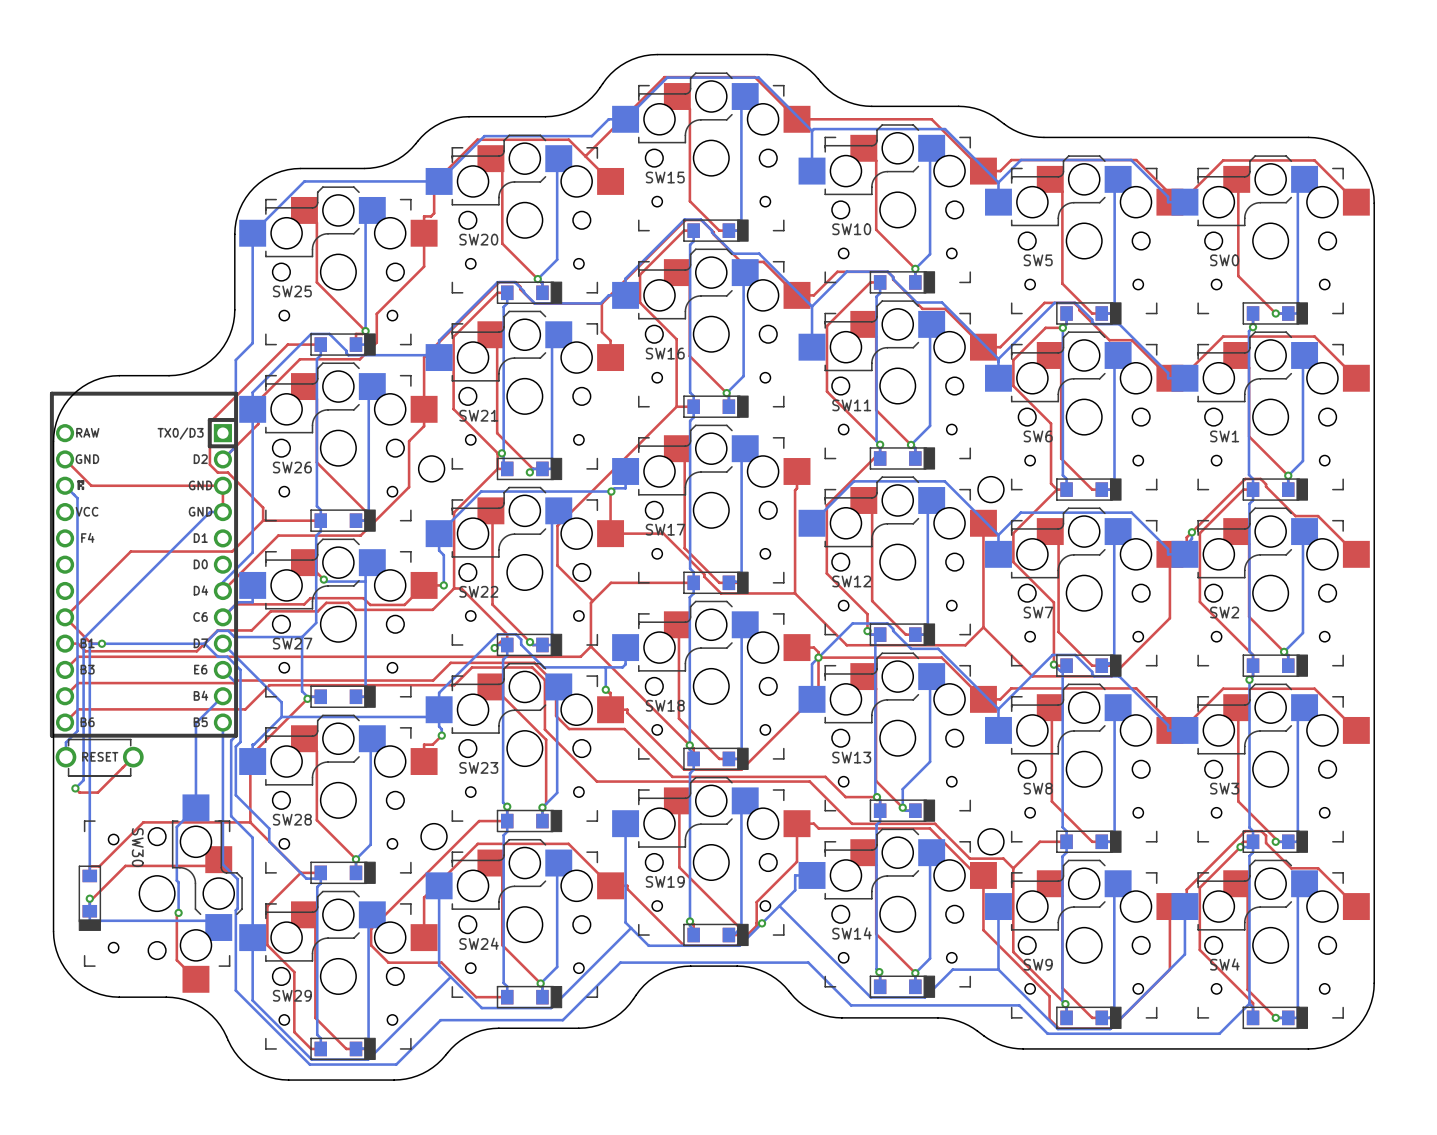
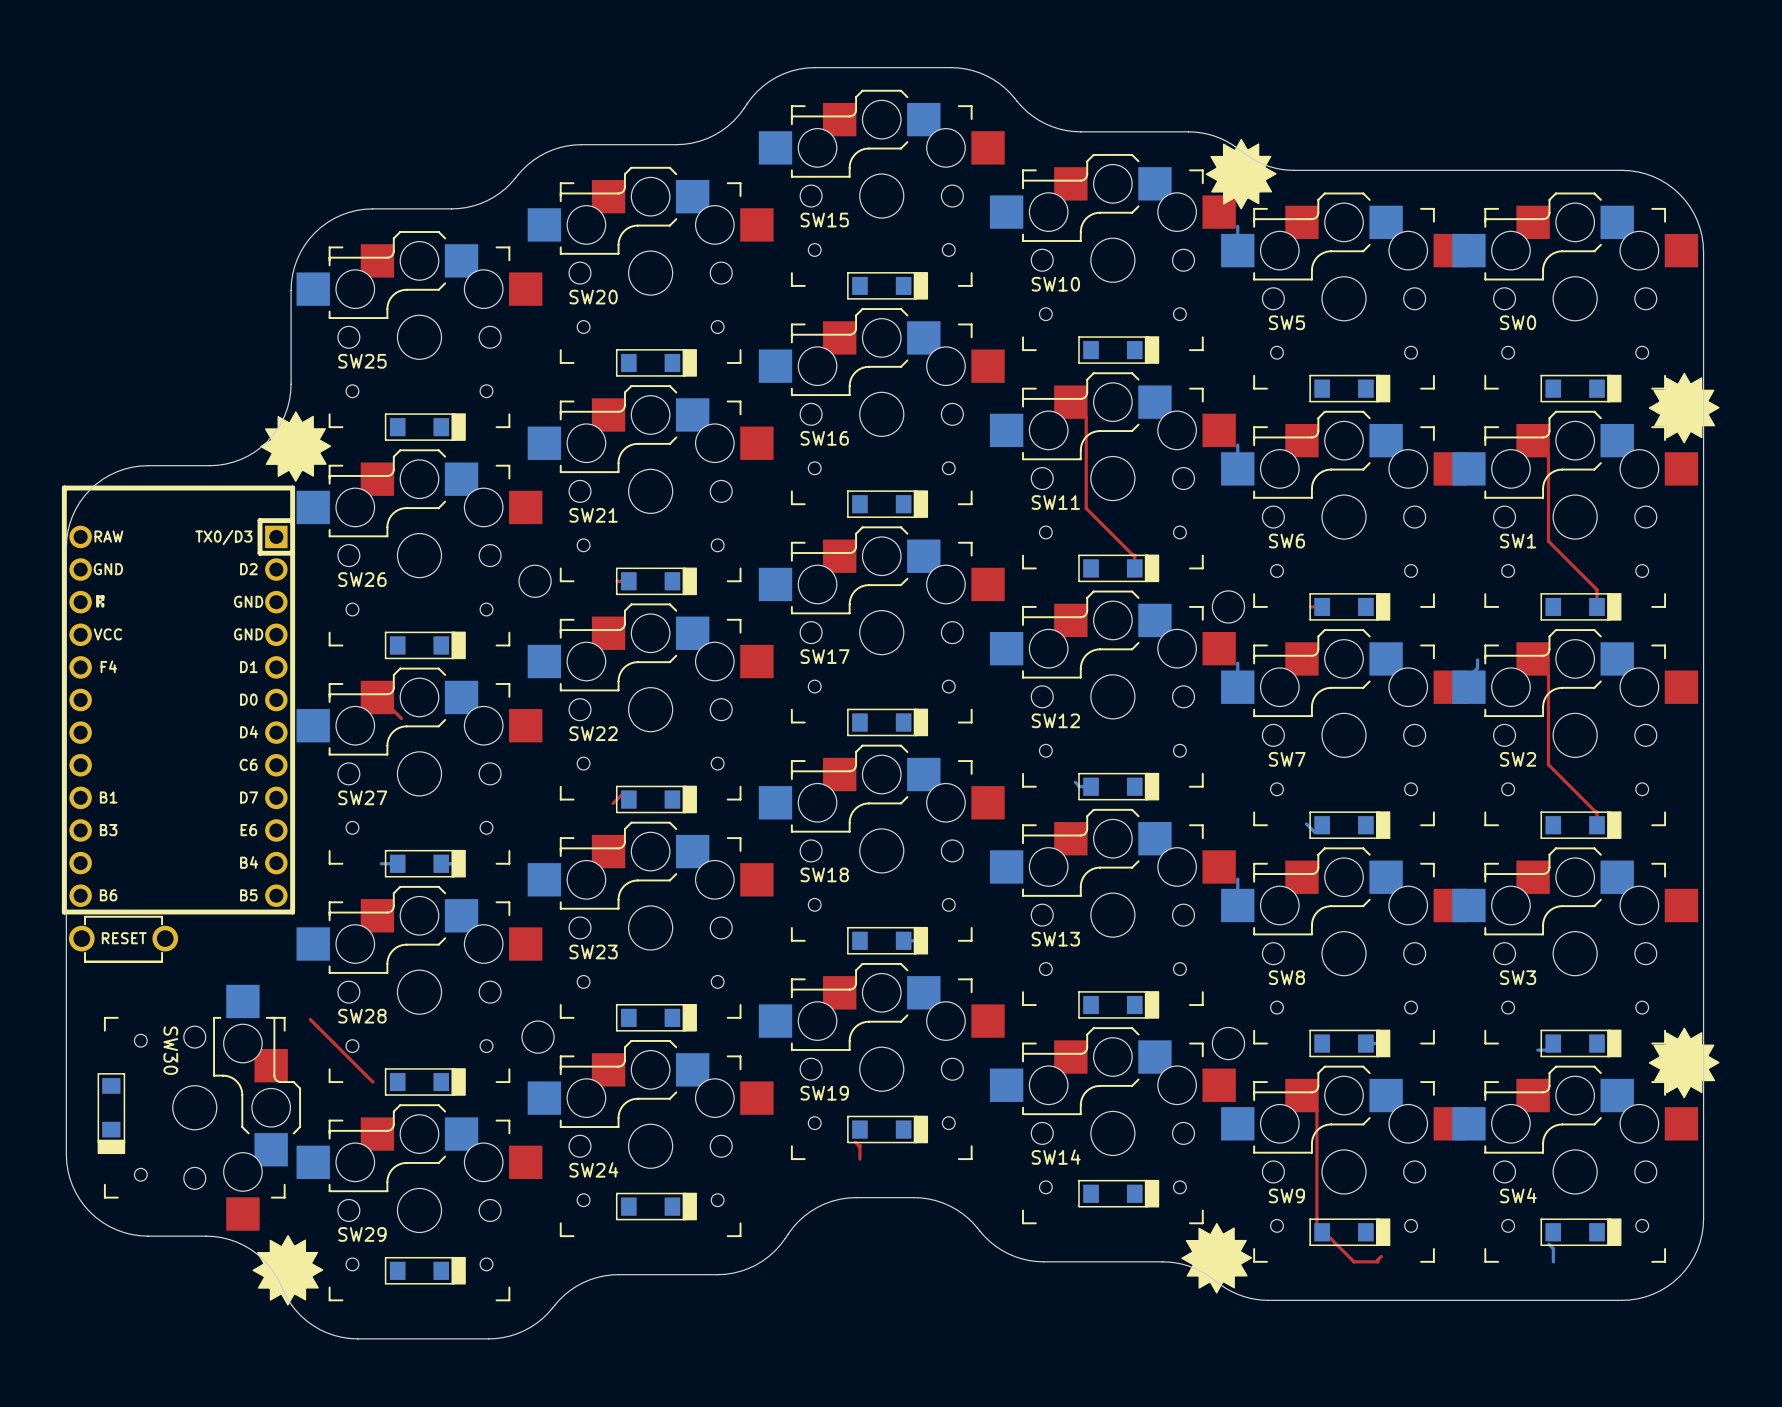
top track: (677, 96) (689, 109) (689, 201) (719, 230) (741, 229) -> none
bottom track: (745, 96) (741, 100) (741, 229) (728, 230) -> none
bottom track: (812, 130) (758, 77) (667, 77) (625, 119) (608, 119) (591, 136) (484, 136) (439, 181) (304, 181) (252, 233) (252, 343) (235, 360) (235, 446) (222, 459) -> none
bottom track: (812, 130) (813, 129) (945, 129) (998, 182) (1021, 159) (1131, 159) (1168, 196) (1168, 202) (1184, 202) -> none
bottom track: (812, 130) (812, 171) -> none
part: none -> (1241, 174)
top track: (863, 148) (876, 160) (876, 229) (915, 268) (915, 282) -> none
bottom track: (931, 148) (930, 149) (930, 254) (915, 268) (915, 282) -> none
top track: (585, 156) (664, 77) (754, 77) (797, 119) (931, 119) (983, 171) (1000, 171) (1011, 160) (1136, 160) (1178, 202) -> none
top track: (490, 158) (502, 170) (502, 243) (542, 282) (542, 292) -> none
bottom track: (558, 158) (557, 160) (557, 259) (537, 279) (542, 282) (542, 292) -> none
top track: (1050, 179) (1062, 191) (1062, 283) (1092, 313) (1111, 313) (1114, 311) -> none
bottom track: (1118, 179) (1114, 182) (1114, 311) (1112, 313) (1101, 313) -> none
top track: (1236, 179) (1238, 180) (1238, 276) (1275, 313) (1288, 313) -> none
bottom track: (1304, 179) (1297, 186) (1297, 313) (1275, 313) -> none
top track: (610, 181) (568, 139) (477, 139) (434, 183) (434, 213) (431, 216) (424, 216) (424, 266) (376, 313) (376, 342) (359, 359) (299, 359) (258, 400) (258, 424) (222, 459) -> none
top track: (1356, 202) (1314, 160) (1223, 160) (1186, 196) (1186, 202) (1169, 202) -> none
top track: (304, 210) (316, 222) (316, 282) (365, 331) (362, 333) (356, 333) (356, 344) -> none
bottom track: (372, 210) (365, 217) (365, 344) (356, 344) -> none
bottom track: (693, 230) (693, 241) (690, 244) (690, 392) (693, 396) (693, 417) (690, 420) (690, 568) (693, 572) (693, 593) (689, 597) (689, 749) (693, 753) (693, 769) (689, 773) (689, 926) (693, 929) (693, 935) -> none
top track: (693, 230) (684, 230) (640, 274) (640, 302) (676, 339) (676, 406) -> none
via: (915, 268) -> none
top track: (677, 272) (689, 285) (689, 356) (728, 395) (728, 406) -> none
bottom track: (745, 272) (743, 274) (743, 376) (726, 393) (728, 395) (728, 406) -> none
via: (537, 279) -> none
bottom track: (880, 282) (880, 293) (876, 296) (876, 441) (880, 444) (880, 458) -> none
top track: (880, 282) (870, 282) (826, 326) (826, 391) (880, 444) (880, 458) -> none
bottom track: (507, 292) (507, 303) (503, 306) (503, 467) (507, 468) -> none
top track: (507, 292) (497, 292) (453, 336) (453, 409) (497, 453) -> none
top track: (601, 303) (685, 220) (701, 220) (741, 261) (763, 261) (797, 295) (813, 295) (837, 271) (887, 271) (922, 308) (945, 308) (983, 347) (1000, 347) (1044, 302) (1074, 302) (1109, 340) (1131, 340) (1169, 378) (1186, 378) (1186, 372) (1223, 336) (1314, 336) (1356, 378) -> none
top track: (601, 303) (601, 332) (610, 340) (610, 357) -> none
top track: (601, 303) (534, 303) (515, 282) (499, 282) (424, 357) (424, 426) (409, 441) (409, 487) (360, 535) (278, 535) (222, 591) -> none
bottom track: (812, 306) (812, 347) -> none
bottom track: (812, 306) (846, 271) (887, 271) (916, 302) (941, 302) (998, 358) (1054, 302) (1075, 302) (1094, 324) (1119, 324) (1168, 372) (1168, 378) (1184, 378) -> none
bottom track: (812, 306) (759, 253) (733, 253) (700, 219) (684, 219) (625, 278) (625, 295) (608, 295) (600, 303) (534, 303) (514, 282) (497, 282) (439, 340) (439, 357) -> none
bottom track: (1066, 313) (1066, 324) (1062, 327) (1062, 475) (1066, 478) (1066, 489) -> none
top track: (1066, 313) (1066, 324) (1062, 327) (1045, 327) (1013, 360) (1013, 386) (1051, 423) (1051, 483) (1057, 489) (1013, 533) (1013, 562) (1053, 602) (1053, 664) (1066, 665) -> none
bottom track: (1253, 313) (1253, 327) (1248, 331) (1248, 474) (1253, 478) (1253, 500) (1249, 503) (1249, 651) (1253, 655) (1253, 676) (1249, 679) (1249, 827) (1253, 831) (1253, 852) (1249, 855) (1249, 1003) (1219, 1033) (1047, 1033) (1019, 1005) (851, 1005) (808, 962) (620, 962) (562, 1020) (440, 1020) (396, 1064) (309, 1064) (235, 990) (237, 879) (222, 864) (222, 722) -> none
via: (1275, 313) -> none
bottom track: (931, 324) (930, 325) (930, 425) (911, 444) (915, 447) (915, 458) -> none
via: (1062, 327) -> none
via: (1253, 327) -> none
part: none -> (1684, 408)
via: (365, 331) -> none
top track: (490, 334) (497, 341) (497, 433) (532, 468) -> none
bottom track: (558, 334) (552, 341) (552, 468) (532, 468) (529, 472) -> none
bottom track: (320, 344) (320, 355) (316, 359) (316, 506) (320, 510) (320, 531) (316, 535) (316, 622) (302, 637) -> none
top track: (320, 344) (287, 344) (209, 422) (209, 464) (217, 472) (227, 472) (263, 507) (263, 520) -> none
bottom track: (439, 355) (348, 355) (329, 333) (311, 333) (252, 392) (252, 552) (222, 582) (222, 591) -> none
top track: (1050, 355) (1061, 366) (1061, 458) (1092, 489) (1114, 489) -> none
bottom track: (1118, 355) (1114, 359) (1114, 489) (1101, 489) -> none
bottom track: (1304, 355) (1302, 357) (1302, 460) (1288, 475) (1288, 489) -> none
part: none -> (295, 446)
top track: (304, 386) (316, 398) (316, 462) (368, 514) (365, 520) (356, 520) -> none
bottom track: (372, 386) (368, 390) (368, 515) (365, 520) (356, 520) -> none
via: (726, 393) -> none
top track: (676, 406) (557, 525) (557, 565) (592, 601) -> none
top track: (693, 406) (676, 406) -> none
via: (880, 444) -> none
via: (911, 444) -> none
top track: (677, 448) (684, 456) (684, 548) (719, 582) (741, 581) -> none
bottom track: (745, 448) (741, 452) (741, 581) (728, 582) -> none
top track: (497, 453) (497, 468) (454, 512) (454, 588) -> none
via: (501, 453) -> none
top track: (880, 453) (826, 505) (826, 573) (867, 614) (867, 631) (870, 634) (880, 634) -> none
top track: (65, 459) (91, 485) (222, 485) (222, 512) -> none
bottom track: (625, 471) (625, 488) (614, 488) (611, 491) (481, 491) (439, 533) (439, 550) (443, 555) (443, 585) -> none
top track: (797, 471) (797, 488) (795, 490) (795, 593) -> none
via: (529, 472) -> none
via: (1288, 475) -> none
bottom track: (65, 485) (77, 498) (77, 730) (65, 742) (65, 757) -> none
top track: (1253, 489) (1243, 489) (1199, 533) (1199, 601) (1253, 655) (1253, 676) -> none
top track: (611, 491) (610, 533) (663, 533) (721, 593) (795, 593) -> none
via: (611, 491) -> none
top track: (863, 500) (872, 508) (872, 601) (905, 634) (927, 634) -> none
bottom track: (931, 500) (927, 504) (927, 634) (915, 634) -> none
top track: (490, 510) (492, 512) (492, 604) (532, 644) (542, 644) -> none
bottom track: (558, 510) (552, 517) (552, 644) (532, 644) (530, 642) -> none
bottom track: (222, 512) (210, 512) (83, 638) (83, 780) (75, 788) -> none
top track: (263, 520) (232, 551) (130, 551) (65, 617) (91, 643) (101, 643) -> none
top track: (320, 520) (263, 520) -> none
bottom track: (812, 523) (853, 481) (944, 481) (998, 535) (1020, 512) (1131, 512) (1168, 549) (1168, 554) (1184, 554) -> none
top track: (983, 523) (983, 627) -> none
top track: (1050, 531) (1058, 539) (1058, 632) (1092, 665) (1111, 665) (1114, 663) -> none
bottom track: (1118, 531) (1114, 535) (1114, 663) (1101, 665) -> none
bottom track: (1304, 531) (1302, 533) (1302, 633) (1284, 651) (1288, 655) (1288, 665) -> none
via: (1191, 532) -> none
top track: (1356, 554) (1318, 516) (1295, 516) (1260, 478) (1245, 478) (1186, 537) (1186, 554) (1169, 554) (1169, 618) (1111, 676) (1032, 676) (983, 627) -> none
bottom track: (372, 562) (365, 569) (365, 696) -> none
bottom track: (323, 579) (325, 581) (365, 581) -> none
via: (323, 579) -> none
top track: (693, 582) (610, 582) (590, 602) (590, 646) -> none
bottom track: (252, 585) (252, 602) (237, 602) (222, 617) -> none
top track: (443, 585) (424, 585) (404, 604) (370, 604) (363, 598) (310, 598) (304, 604) (235, 604) (222, 617) -> none
via: (443, 585) -> none
top track: (454, 588) (461, 588) (507, 634) (507, 644) -> none
top track: (454, 588) (432, 609) (355, 609) (348, 602) (326, 602) (317, 611) (270, 611) (251, 630) (217, 630) (196, 651) (85, 651) (77, 643) (65, 643) -> none
top track: (795, 593) (846, 645) (965, 645) (983, 627) -> none
top track: (677, 624) (678, 626) (678, 718) (719, 758) (738, 758) -> none
bottom track: (745, 624) (741, 628) (741, 758) -> none
via: (867, 631) -> none
bottom track: (875, 634) (875, 795) (879, 800) -> none
bottom track: (302, 637) (302, 691) (307, 698) -> none
bottom track: (302, 637) (234, 637) (228, 630) (217, 630) (204, 643) -> none
via: (530, 642) -> none
via: (101, 643) -> none
bottom track: (204, 643) (89, 643) (89, 875) -> none
bottom track: (204, 643) (217, 656) (227, 656) (240, 669) (240, 741) (235, 746) (235, 795) (269, 828) (269, 841) (306, 878) (320, 878) -> none
bottom track: (222, 643) (281, 702) (281, 716) -> none
bottom track: (497, 644) (507, 644) (507, 655) (503, 659) (503, 802) (507, 806) (507, 831) (503, 835) (503, 982) (507, 986) (507, 997) -> none
top track: (590, 646) (693, 748) (693, 758) -> none
top track: (590, 646) (580, 656) (78, 656) (65, 669) -> none
bottom track: (625, 647) (625, 664) (622, 667) (543, 667) (521, 644) (521, 639) (516, 634) (497, 634) (439, 692) (439, 726) (441, 729) (441, 735) -> none
top track: (797, 647) (813, 647) (818, 652) (818, 692) (741, 769) (684, 769) (627, 712) (627, 709) (610, 709) (610, 692) (605, 689) -> none
via: (494, 648) -> none
via: (1284, 651) -> none
top track: (818, 657) (941, 657) (983, 699) (1000, 699) (1011, 688) (1136, 688) (1178, 730) -> none
via: (818, 657) -> none
via: (1053, 664) -> none
bottom track: (605, 667) (605, 689) -> none
bottom track: (222, 669) (235, 682) (235, 735) (231, 740) (231, 816) (252, 837) (252, 1000) (311, 1059) (368, 1059) (450, 976) -> none
bottom track: (1062, 671) (1062, 827) (1066, 831) (1066, 852) (1062, 856) (1062, 1001) (1066, 1007) (1066, 1017) -> none
top track: (863, 676) (876, 688) (876, 780) (905, 810) (915, 810) -> none
bottom track: (931, 676) (930, 678) (930, 761) (902, 789) (902, 807) (905, 810) (915, 810) -> none
via: (1249, 679) -> none
top track: (490, 686) (493, 686) (546, 739) (546, 803) (542, 807) (542, 821) -> none
bottom track: (558, 686) (557, 688) (557, 792) (542, 807) (542, 821) -> none
via: (605, 689) -> none
top track: (65, 696) (78, 683) (433, 680) (450, 662) (534, 662) (556, 684) (556, 716) (569, 729) (624, 729) (672, 776) (825, 776) (845, 797) (877, 797) (880, 800) (880, 810) -> none
bottom track: (222, 696) (195, 723) (195, 807) (176, 826) (178, 912) -> none
top track: (320, 696) (307, 698) (250, 756) (250, 822) (143, 822) (99, 866) (89, 866) (89, 875) -> none
via: (307, 698) -> none
bottom track: (812, 699) (812, 664) (852, 623) (887, 623) (911, 648) (938, 648) (998, 709) (1052, 654) (1075, 654) (1094, 676) (1119, 676) (1168, 725) (1168, 730) (1184, 730) -> none
top track: (1050, 707) (1051, 709) (1051, 801) (1092, 841) (1114, 841) -> none
bottom track: (1118, 707) (1114, 711) (1114, 841) -> none
top track: (1236, 707) (1238, 709) (1238, 801) (1275, 838) (1275, 841) (1288, 841) -> none
bottom track: (1304, 707) (1297, 714) (1297, 841) (1275, 841) -> none
bottom track: (281, 716) (252, 744) (252, 761) -> none
bottom track: (439, 716) (281, 716) -> none
top track: (65, 722) (78, 709) (245, 709) (269, 685) (454, 685) (472, 667) (532, 667) (544, 679) (544, 729) (596, 781) (809, 781) (852, 823) (935, 823) (969, 858) (1003, 858) (1013, 868) -> none
top track: (1356, 730) (1314, 688) (1223, 688) (1186, 725) (1186, 730) (1169, 730) -> none
top track: (441, 735) (432, 744) (424, 744) (424, 761) -> none
via: (441, 735) -> none
top track: (304, 738) (316, 751) (316, 820) (356, 859) (356, 872) -> none
bottom track: (372, 738) (370, 740) (370, 844) (356, 859) (356, 872) -> none
via: (689, 745) -> none
top track: (133, 757) (97, 792) (79, 792) (75, 788) -> none
via: (75, 788) -> none
via: (876, 797) -> none
top track: (677, 800) (679, 802) (679, 867) (741, 929) (738, 935) (728, 935) -> none
bottom track: (745, 800) (741, 804) (741, 929) (733, 935) (728, 935) -> none
bottom track: (880, 800) (880, 821) (876, 824) (876, 969) (879, 972) (880, 986) -> none
top track: (507, 806) (507, 821) (479, 821) (371, 929) (371, 945) (388, 962) (441, 962) (476, 997) (507, 997) -> none
via: (507, 806) -> none
via: (542, 807) -> none
via: (902, 807) -> none
bottom track: (625, 823) (625, 922) (648, 945) (739, 945) (795, 890) (795, 875) (812, 875) -> none
top track: (1066, 841) (1039, 841) (1013, 868) -> none
top track: (1253, 841) (1243, 841) (1240, 847) (1199, 887) (1199, 949) (1253, 1003) (1253, 1017) -> none
via: (1275, 841) -> none
via: (1240, 847) -> none
top track: (863, 852) (876, 865) (876, 934) (915, 973) (915, 986) -> none
bottom track: (931, 852) (930, 854) (930, 958) (915, 973) (915, 986) -> none
part: none -> (1684, 1062)
top track: (218, 859) (212, 865) (125, 865) (89, 901) (89, 911) -> none
via: (356, 859) -> none
top track: (490, 863) (502, 874) (502, 945) (542, 985) (542, 997) -> none
bottom track: (558, 863) (557, 864) (557, 967) (540, 983) (542, 985) (542, 997) -> none
top track: (1013, 868) (1013, 951) (1065, 1004) (1066, 1017) -> none
bottom track: (320, 872) (320, 883) (317, 887) (317, 1034) (320, 1038) (320, 1048) -> none
top track: (320, 872) (300, 872) (267, 906) (267, 945) (294, 972) (294, 1032) (311, 1048) (320, 1048) -> none
bottom track: (1118, 883) (1114, 887) (1114, 1013) (1109, 1017) (1101, 1017) -> none
top track: (1236, 883) (1247, 894) (1247, 989) (1275, 1017) (1288, 1017) -> none
bottom track: (1304, 883) (1297, 890) (1297, 1017) (1275, 1017) -> none
bottom track: (439, 885) (439, 965) (481, 1008) (551, 1008) (631, 928) -> none
bottom track: (89, 898) (89, 920) (212, 920) (218, 927) -> none
via: (89, 898) -> none
bottom track: (779, 905) (870, 997) (924, 997) (952, 969) (998, 969) -> none
bottom track: (998, 906) (998, 969) -> none
bottom track: (1184, 906) (1184, 954) (1110, 1029) (1057, 1029) (998, 969) -> none
top track: (1356, 906) (1318, 868) (1291, 868) (1266, 843) (1266, 835) (1261, 831) (1245, 831) (1186, 889) (1186, 906) (1169, 906) (1169, 969) (1110, 1028) (1058, 1028) (1049, 1019) (1049, 996) (983, 930) (983, 875) (976, 875) (929, 828) (818, 828) (813, 823) (797, 823) (797, 861) (756, 902) (756, 925) (736, 945) (684, 945) (627, 888) (627, 885) (610, 885) (568, 843) (477, 843) (424, 897) (424, 937) -> none
top track: (178, 912) (176, 914) (176, 960) (195, 979) -> none
via: (178, 912) -> none
top track: (304, 914) (315, 925) (315, 1017) (346, 1048) (368, 1048) -> none
bottom track: (372, 914) (368, 918) (368, 1048) (356, 1048) -> none
via: (689, 921) -> none
via: (762, 923) -> none
part position: (715, 934) -> (887, 1129)
via: (879, 972) -> none
via: (915, 973) -> none
via: (540, 983) -> none
part position: (902, 986) -> (1118, 1193)
part position: (529, 997) -> (656, 1206)
via: (1065, 1004) -> none
part: none -> (1216, 1258)
part position: (1088, 1017) -> (1349, 1232)
part position: (1275, 1017) -> (1580, 1232)
via: (1275, 1017) -> none
part: none -> (287, 1270)
part position: (343, 1048) -> (425, 1270)

